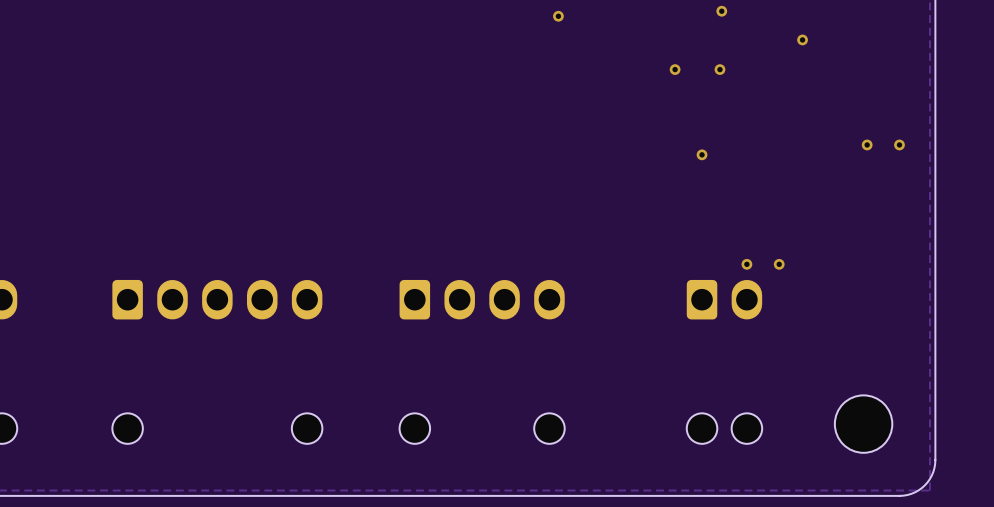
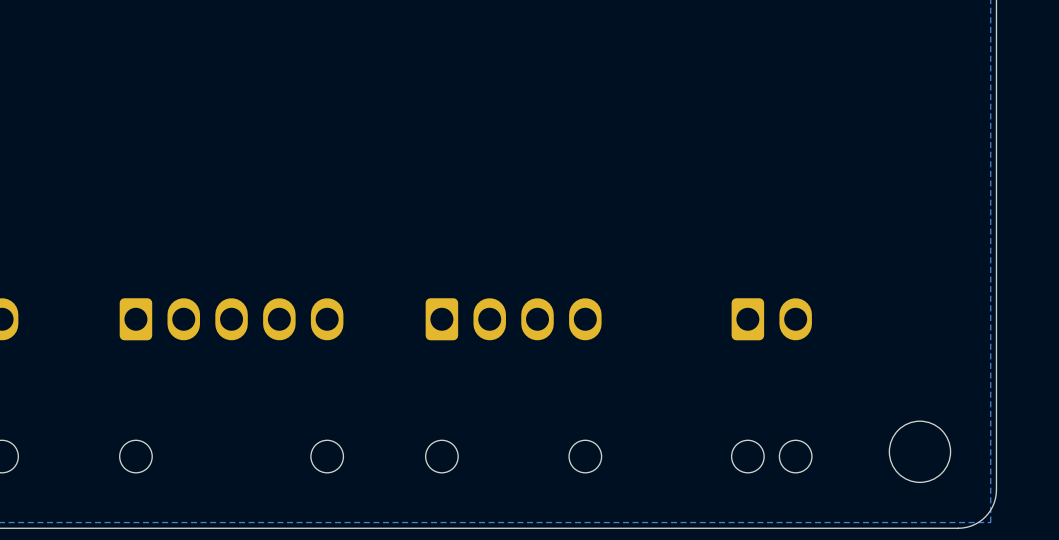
via: (721, 11) -> none
via: (558, 16) -> none
via: (802, 39) -> none
via: (675, 69) -> none
via: (719, 69) -> none
via: (867, 144) -> none
via: (899, 144) -> none
via: (702, 154) -> none
via: (746, 264) -> none
via: (779, 264) -> none

